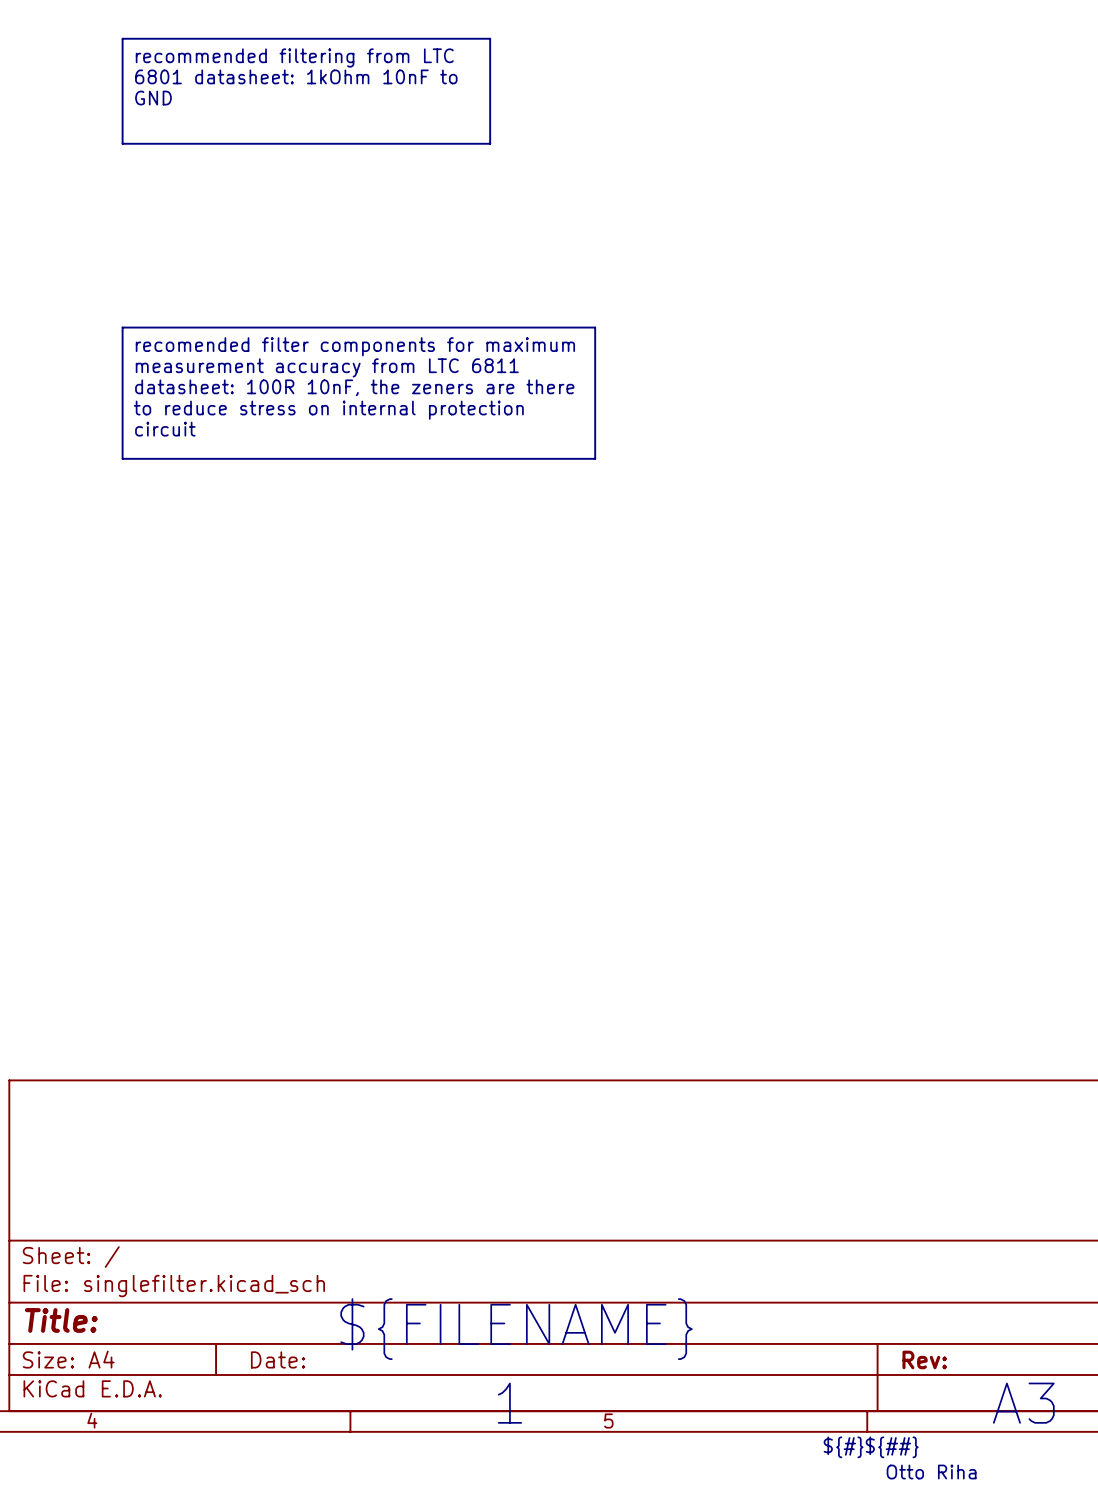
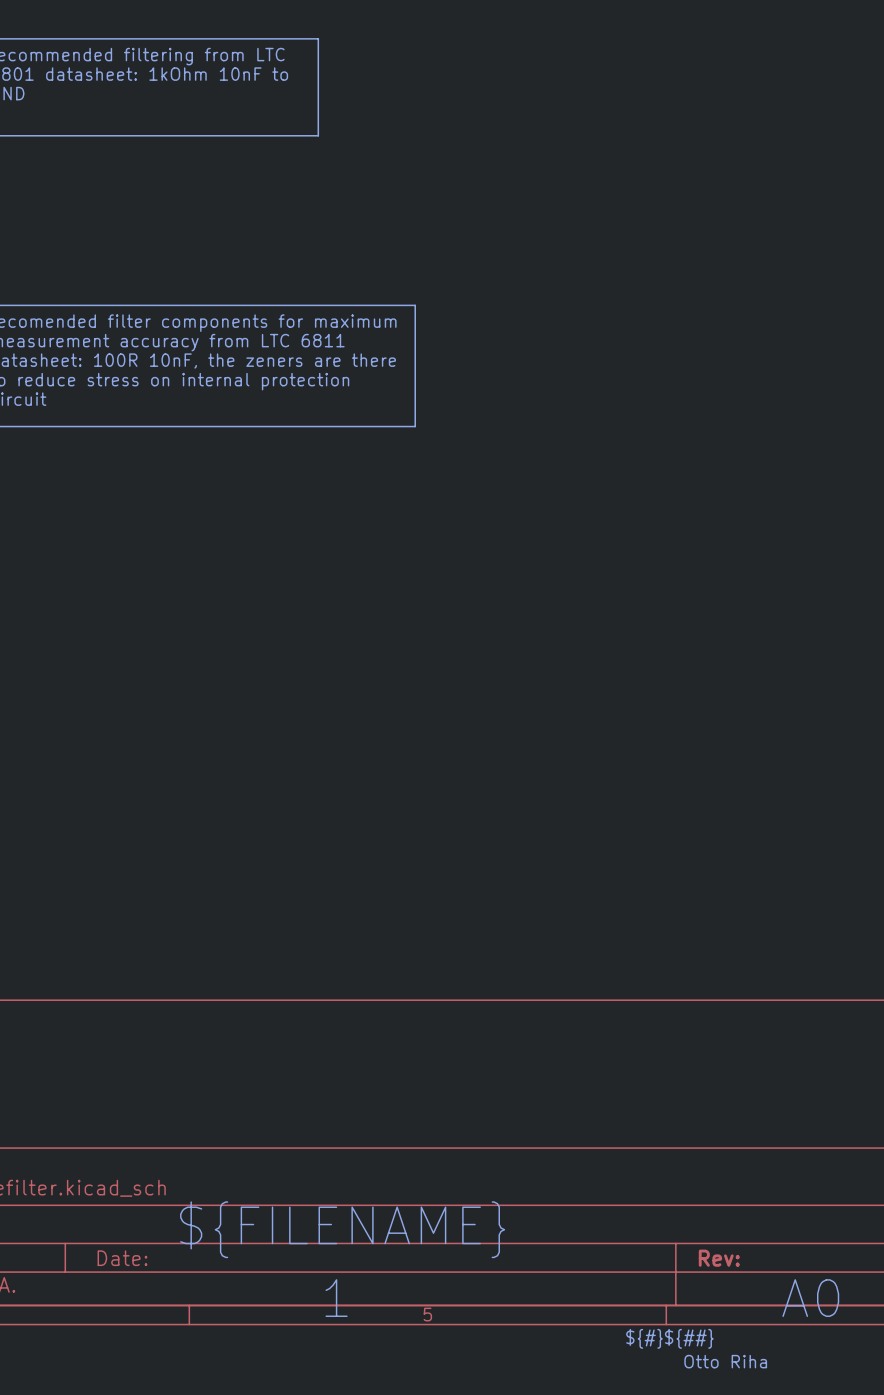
text: A3 (1023, 1403) -> A0 (810, 1298)

